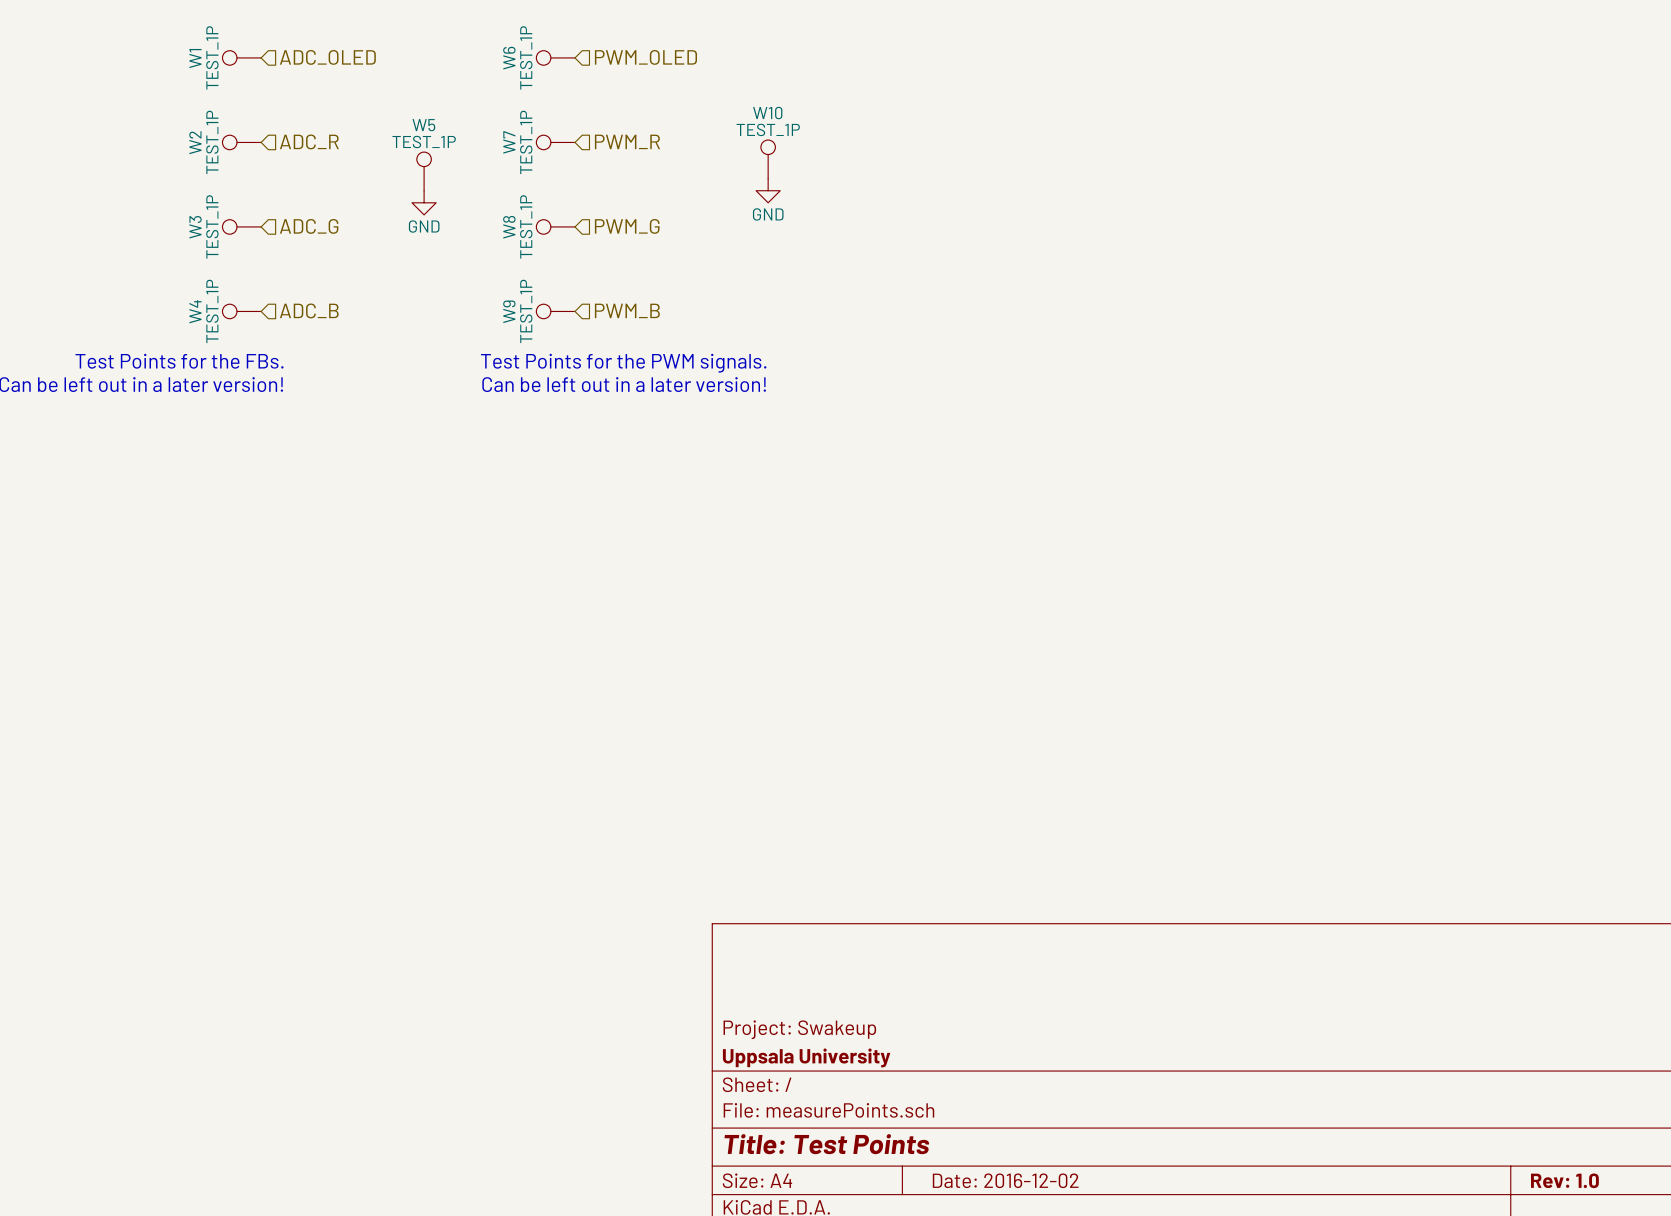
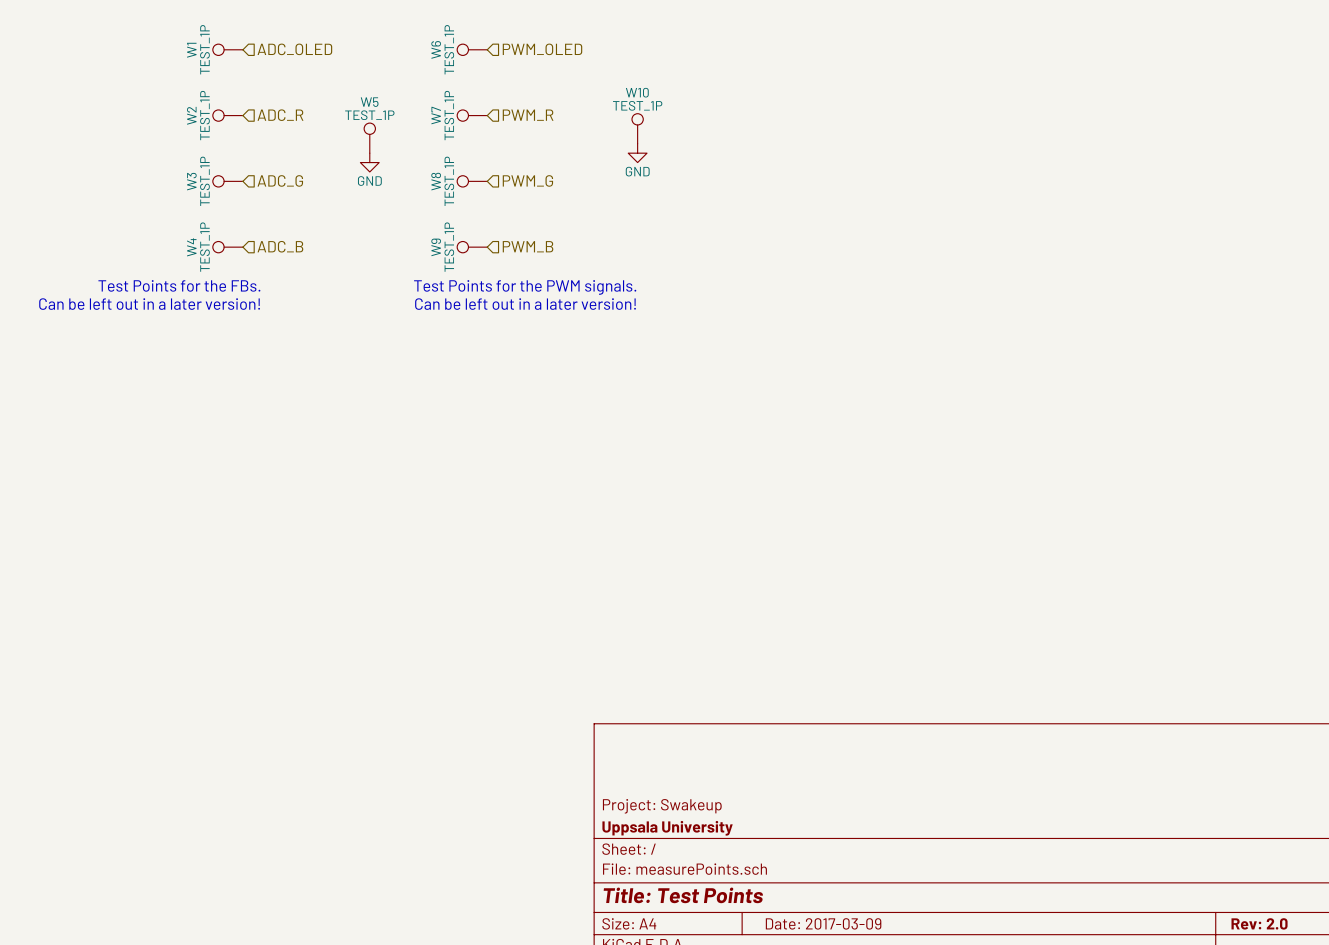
title block: Date: 2016-12-02 (1005, 1180) -> Date: 2017-03-09 (823, 923)
title block: Rev: 1.0 (1564, 1180) -> Rev: 2.0 (1259, 923)

